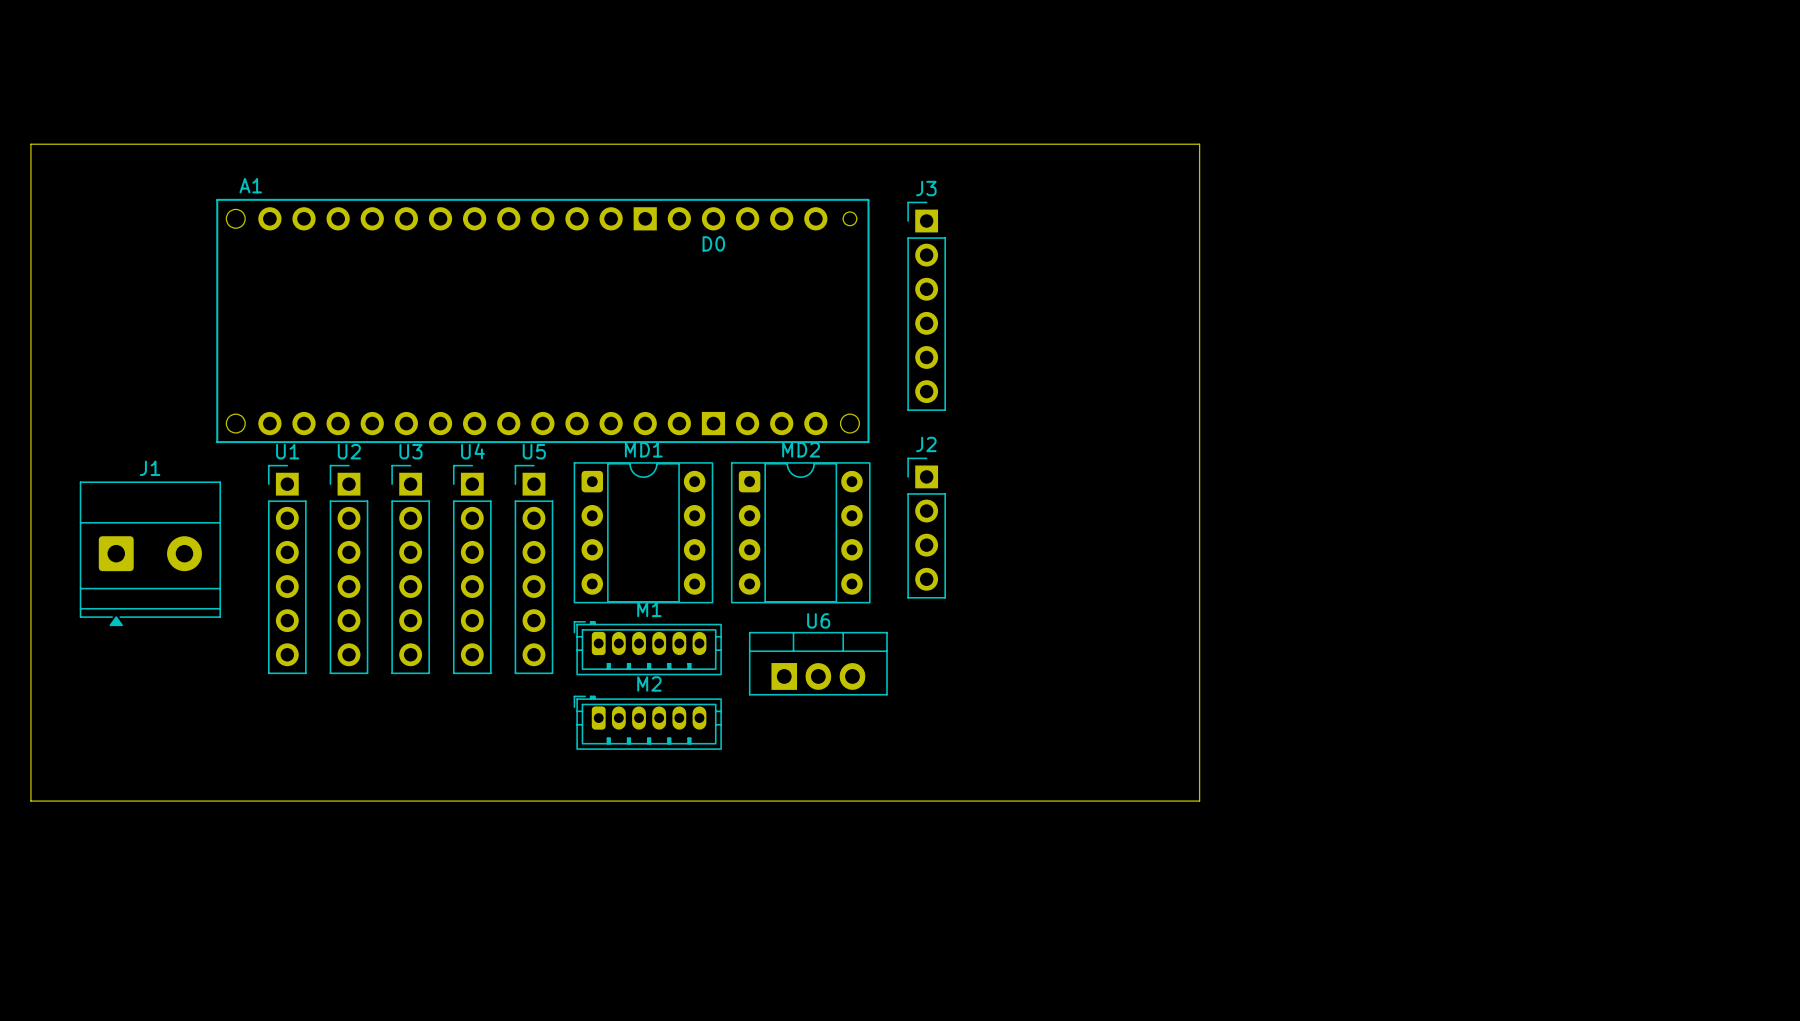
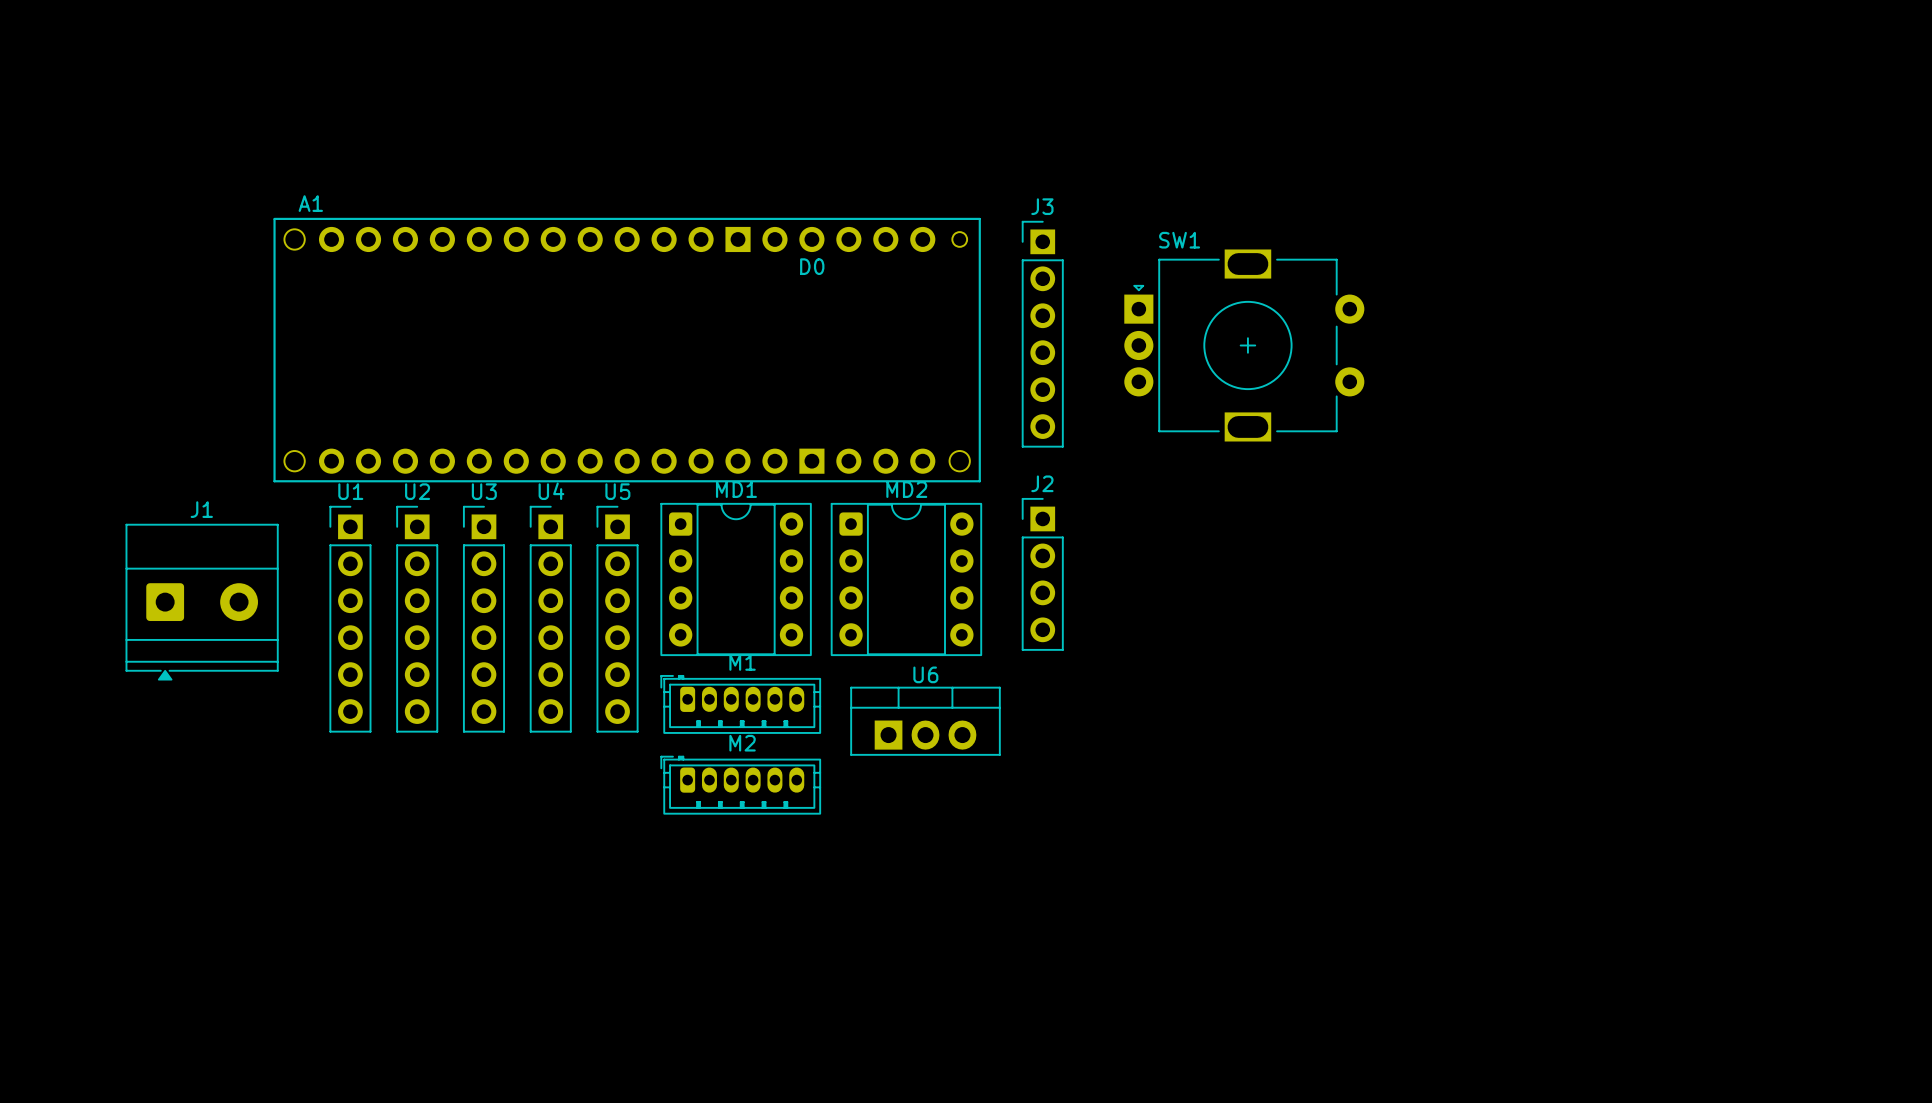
board edge: (30, 144) (1199, 144) (1199, 801) (30, 801) (30, 144) -> none
SW1: none -> (1244, 345)

